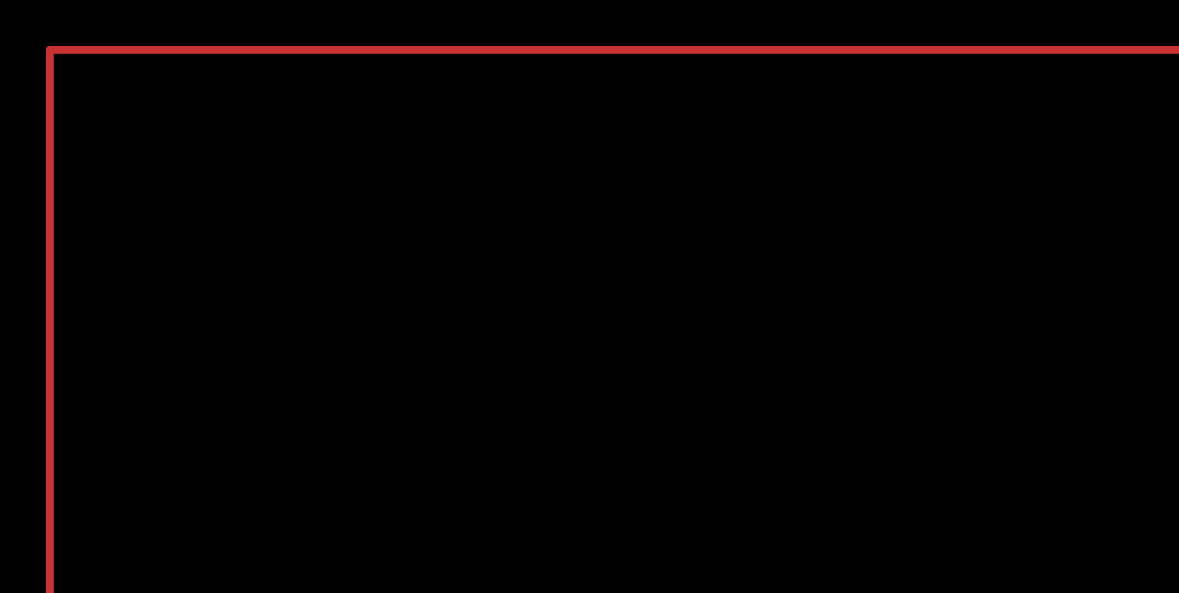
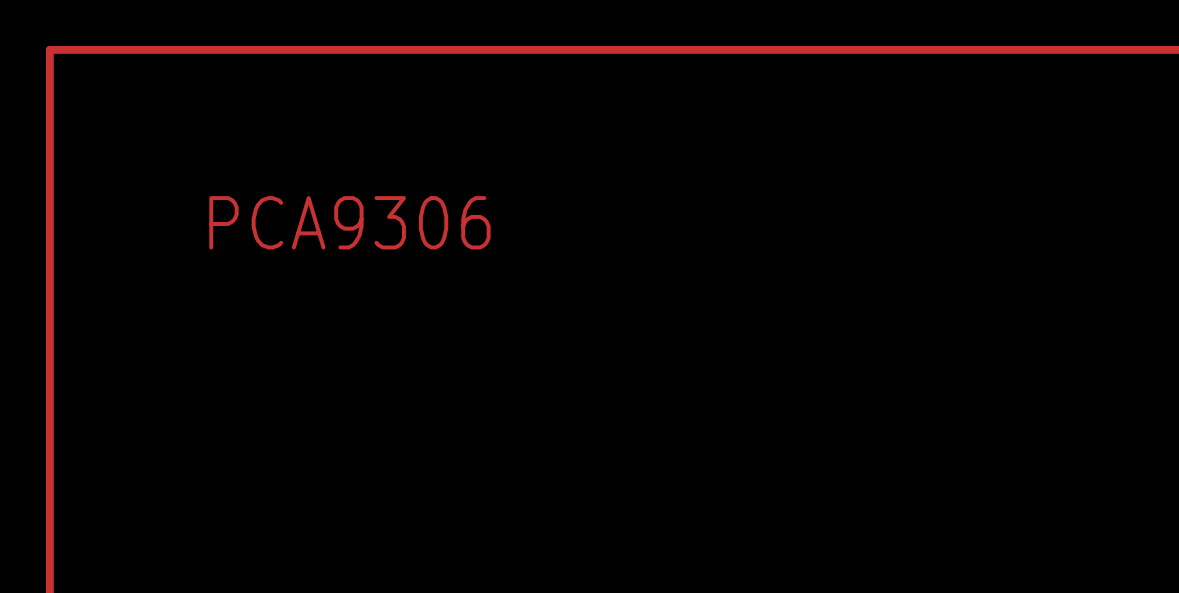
text: none -> PCA9306 (349, 222)

